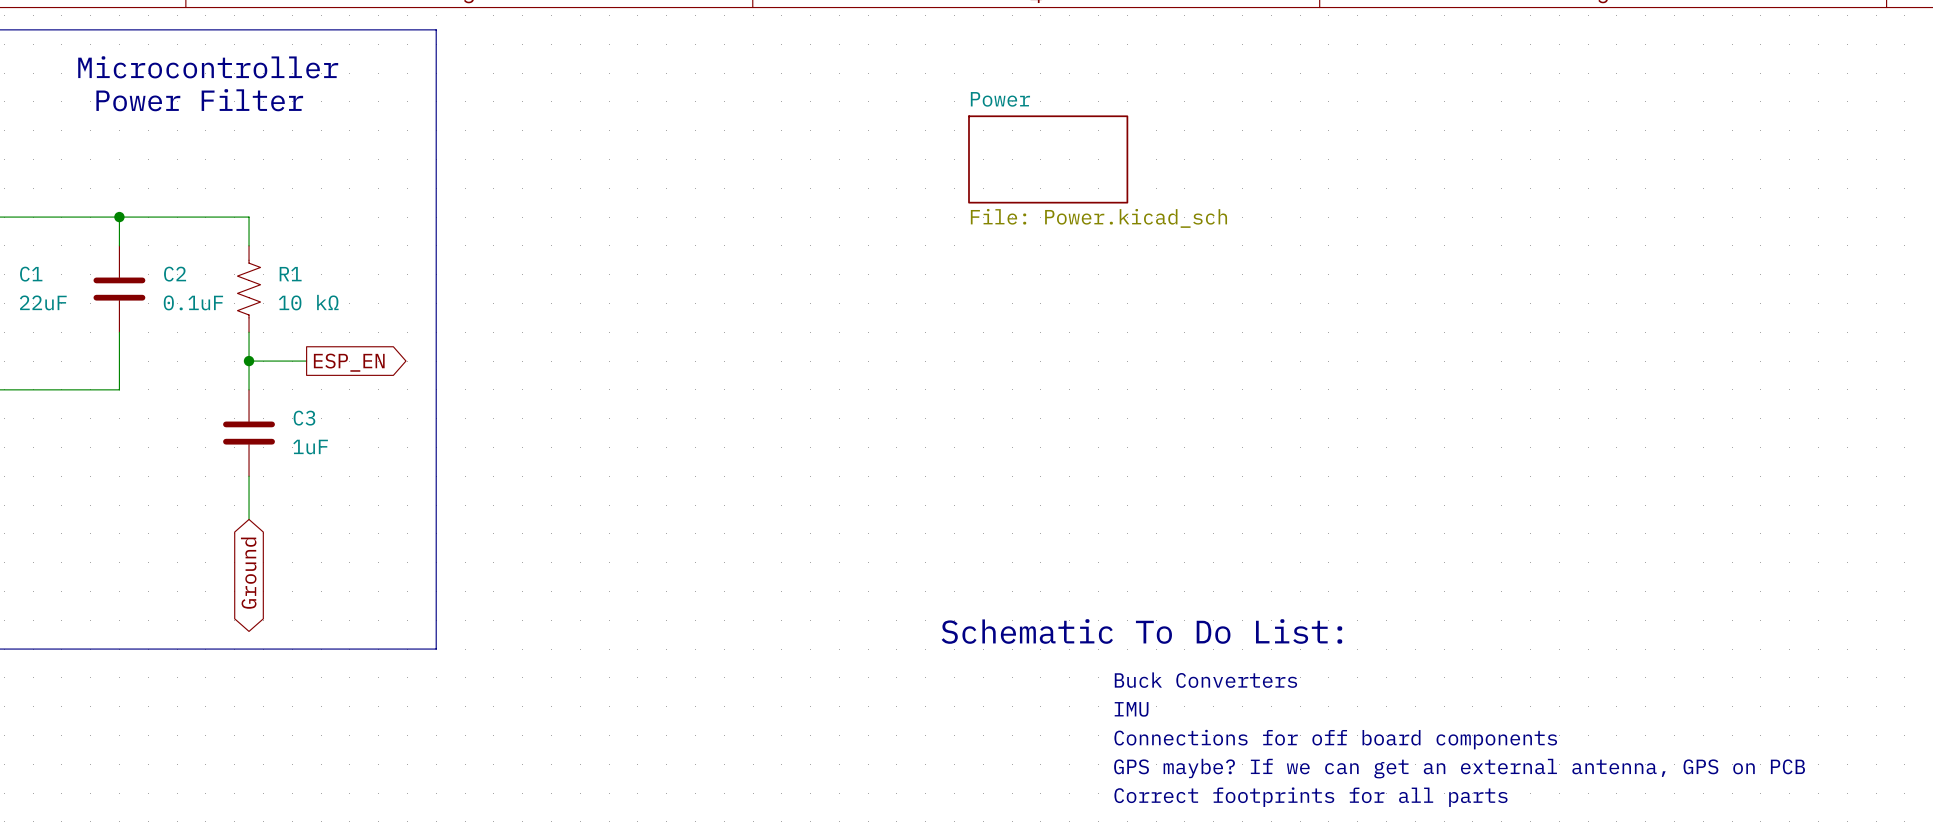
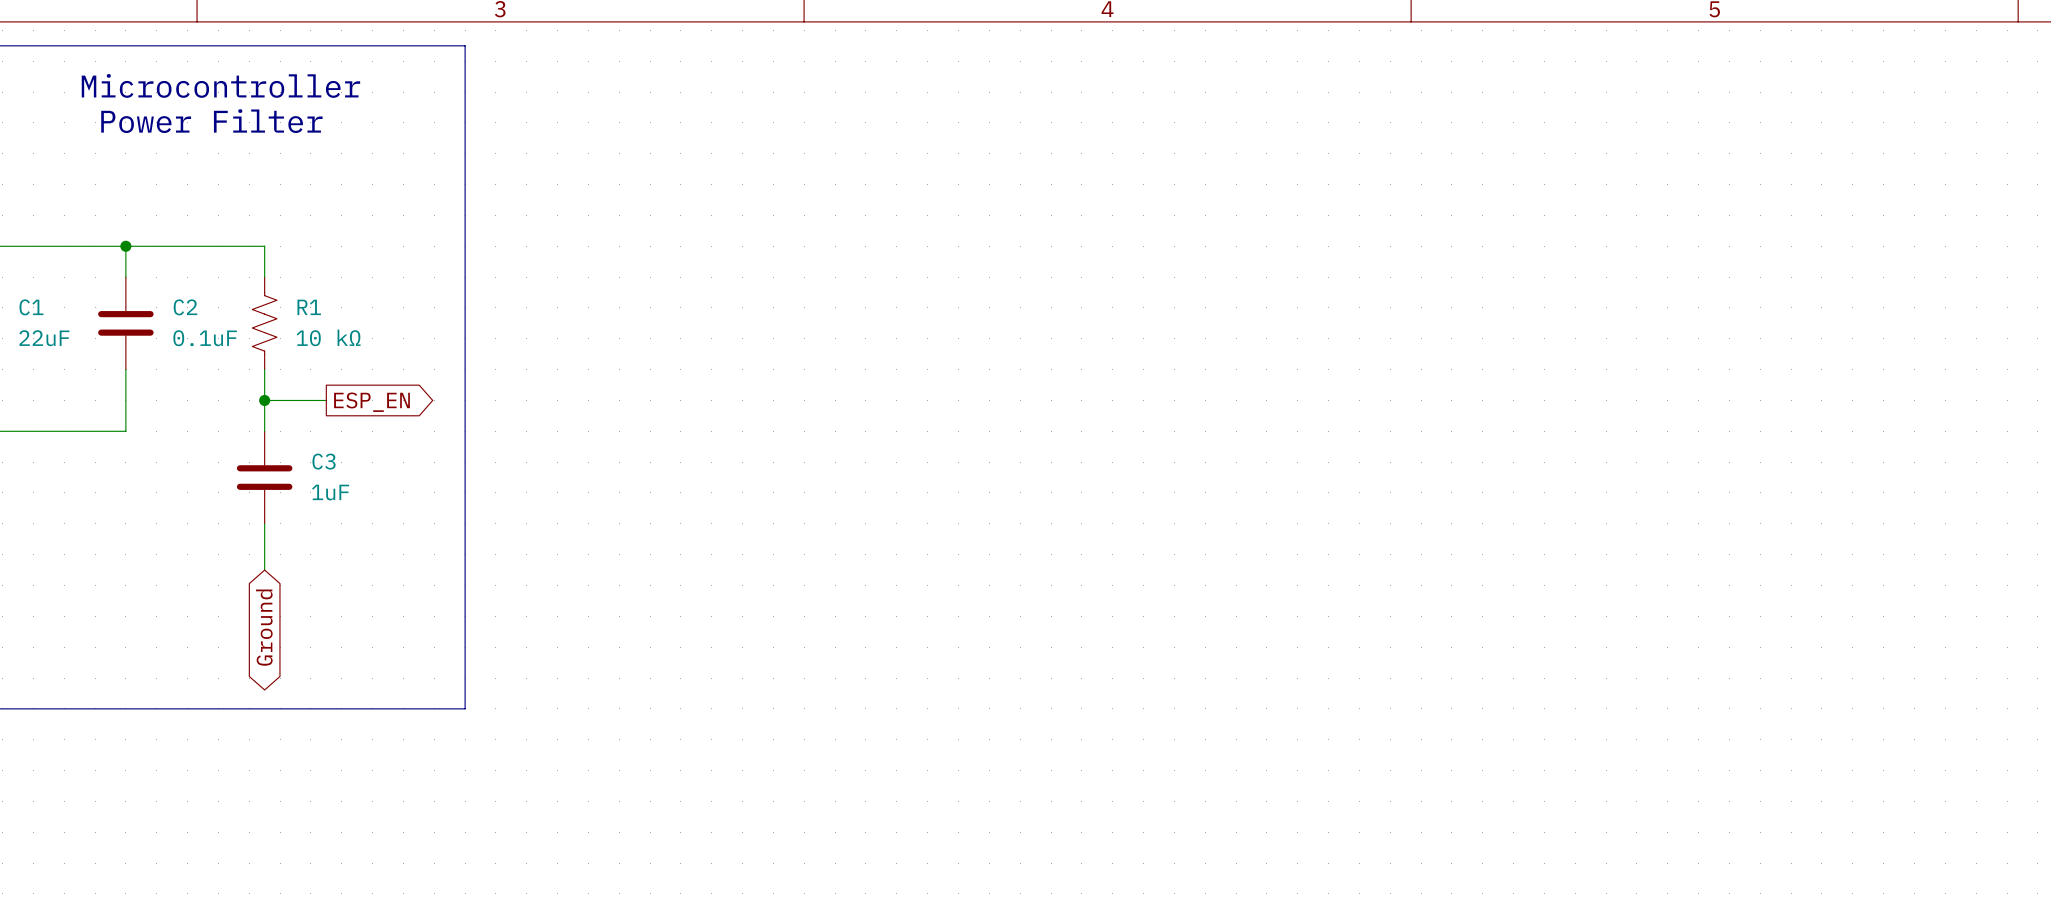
sheet Power: File: Power.kicad_sch (1048, 159) -> none
text: Schematic To Do List: (1141, 631) -> none
text: Buck Converters (1205, 680) -> none
text: IMU (1131, 709) -> none
text: Connections for off board components (1335, 739) -> none
text: GPS maybe? If we can get an external antenna, GPS on PCB (1459, 768) -> none
text: Correct footprints for all parts (1310, 797) -> none

